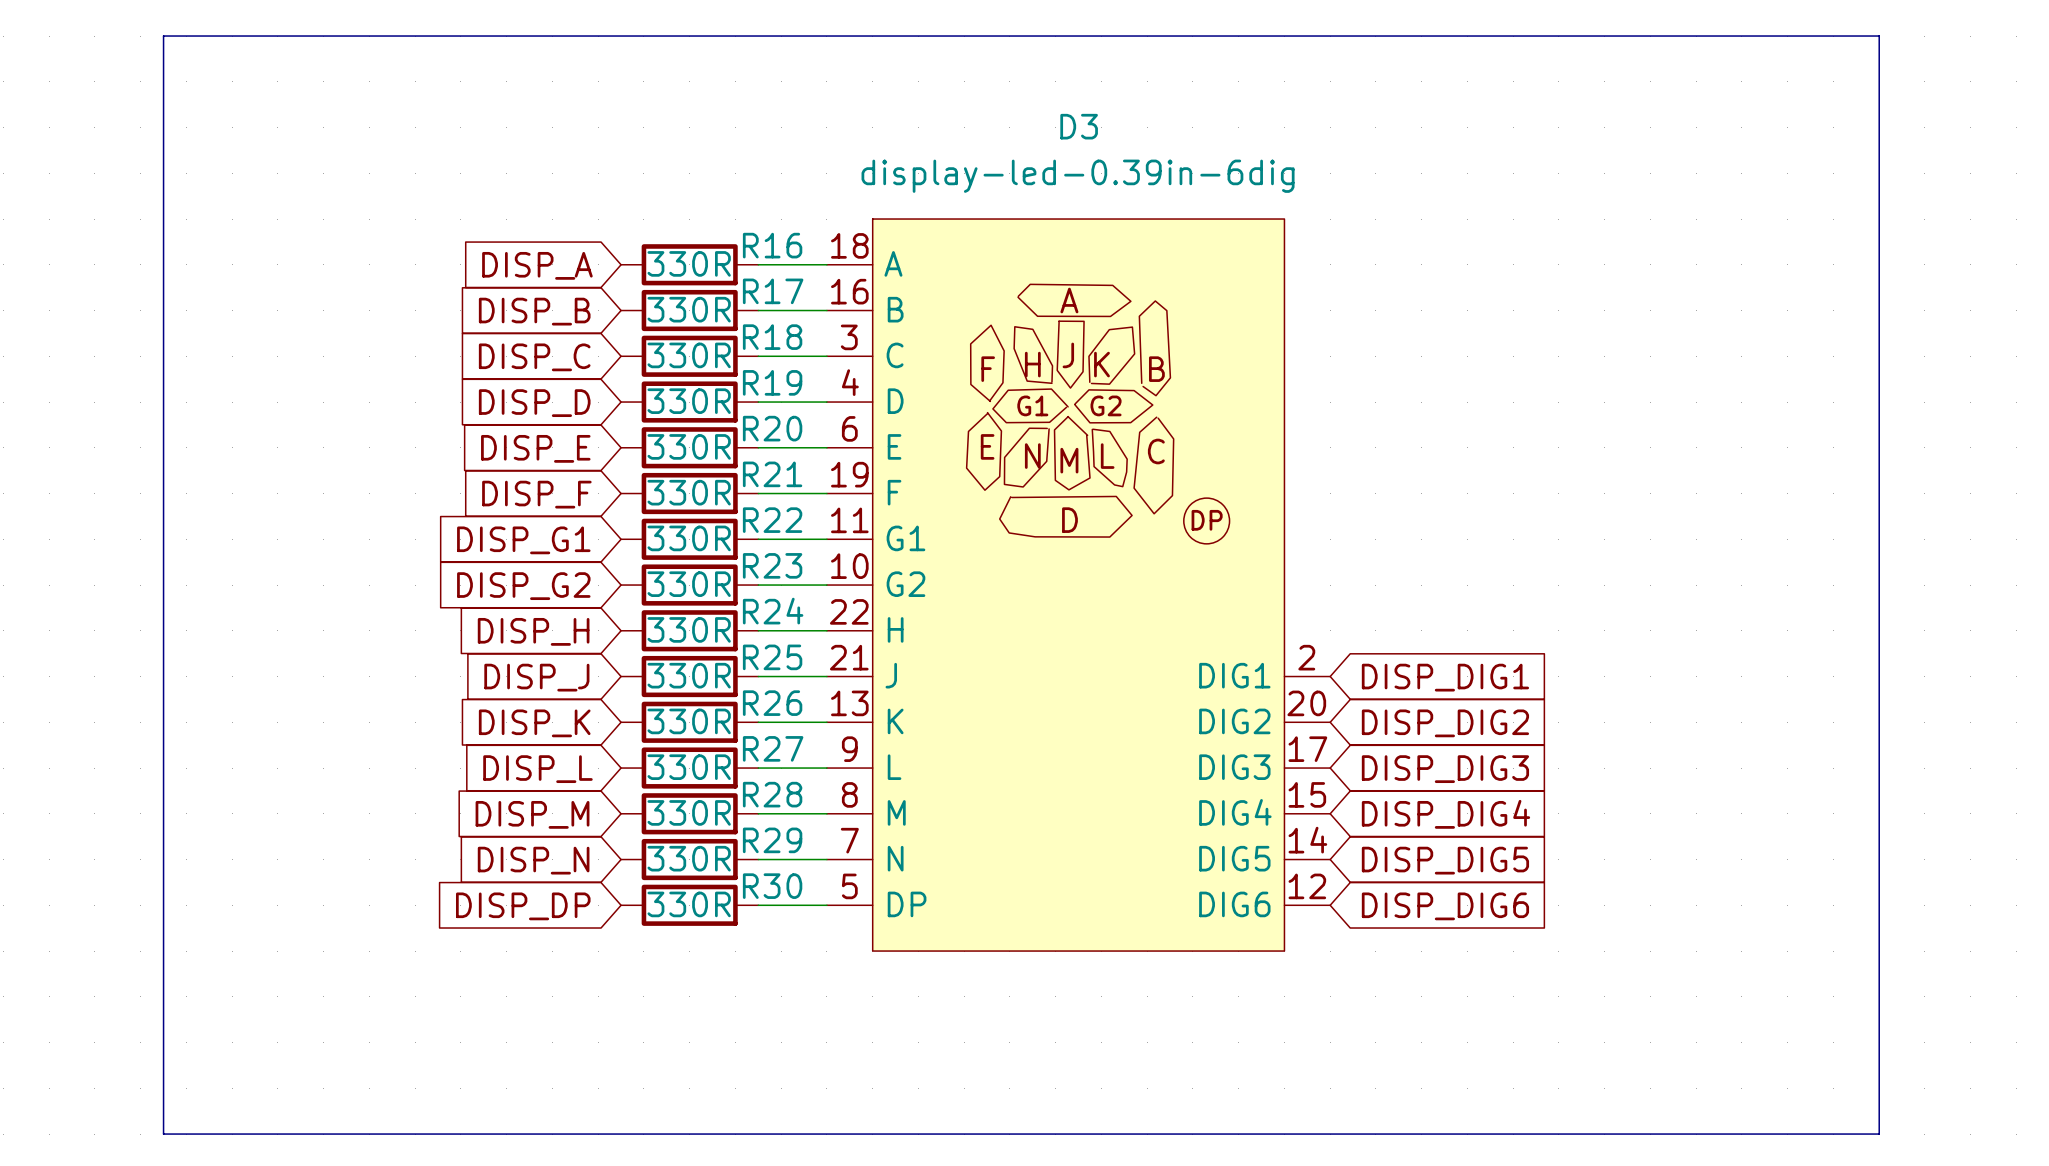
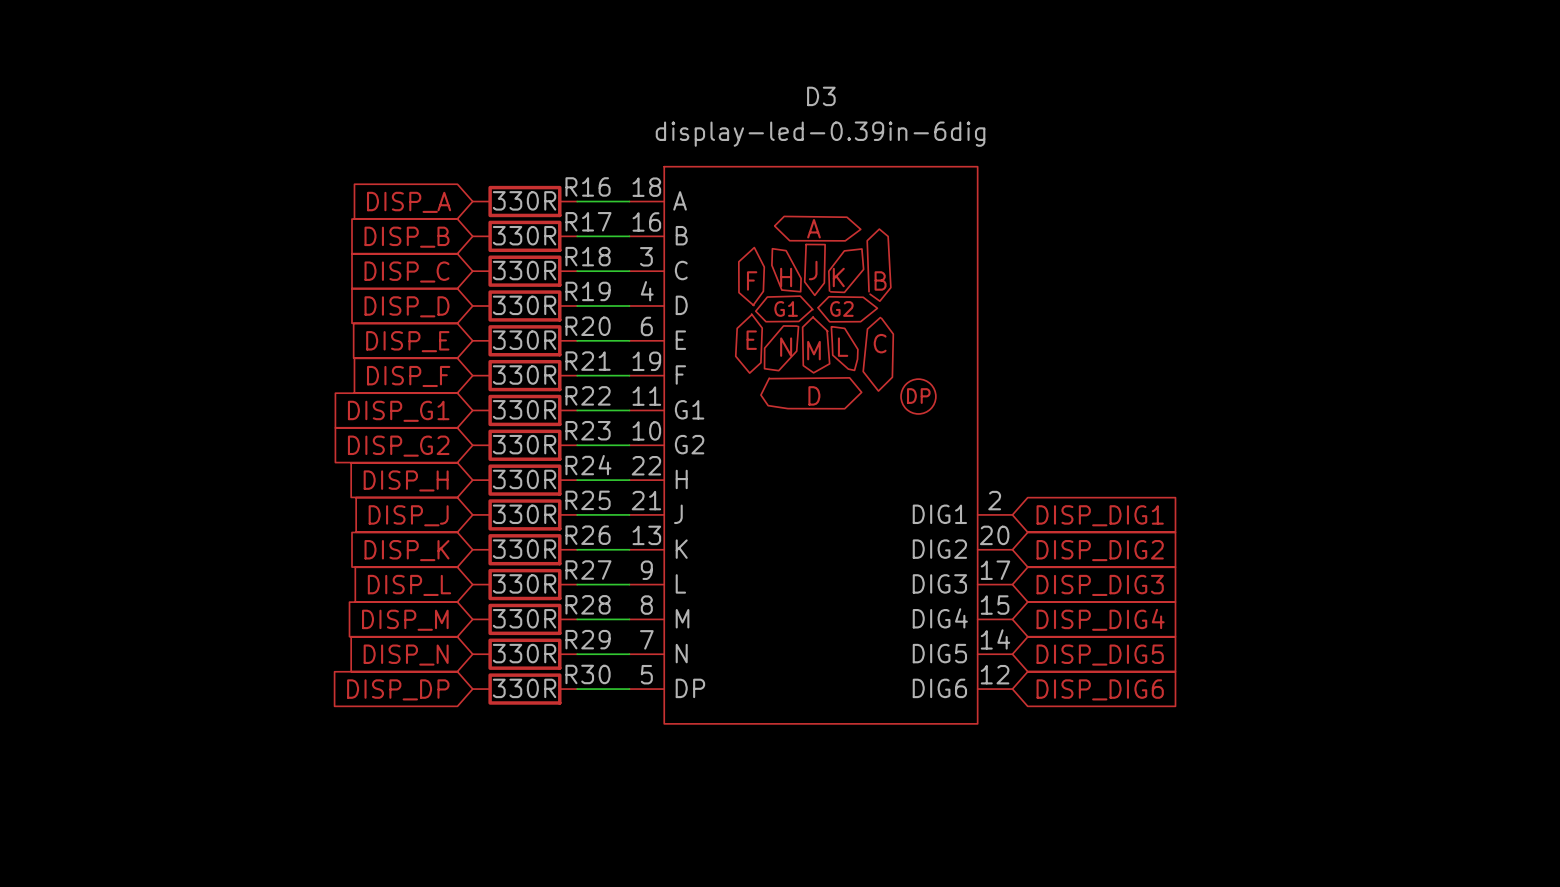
line: (163, 36) (1879, 36) (1879, 1134) (163, 1134) (163, 36) -> none

